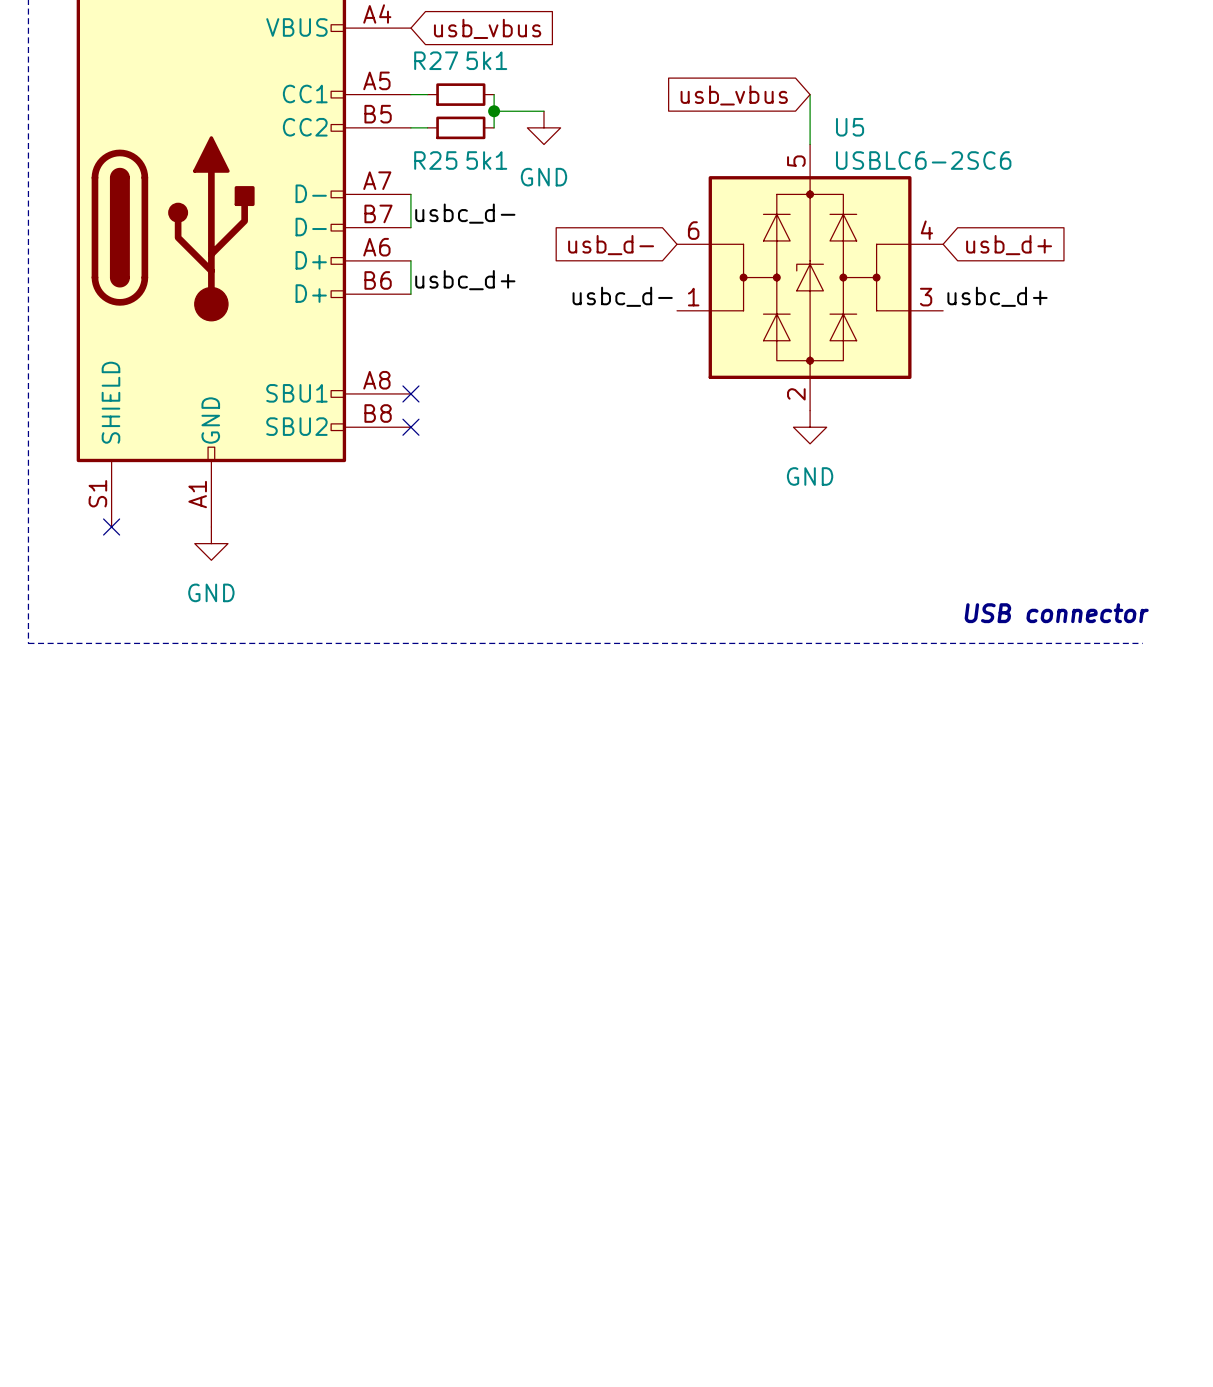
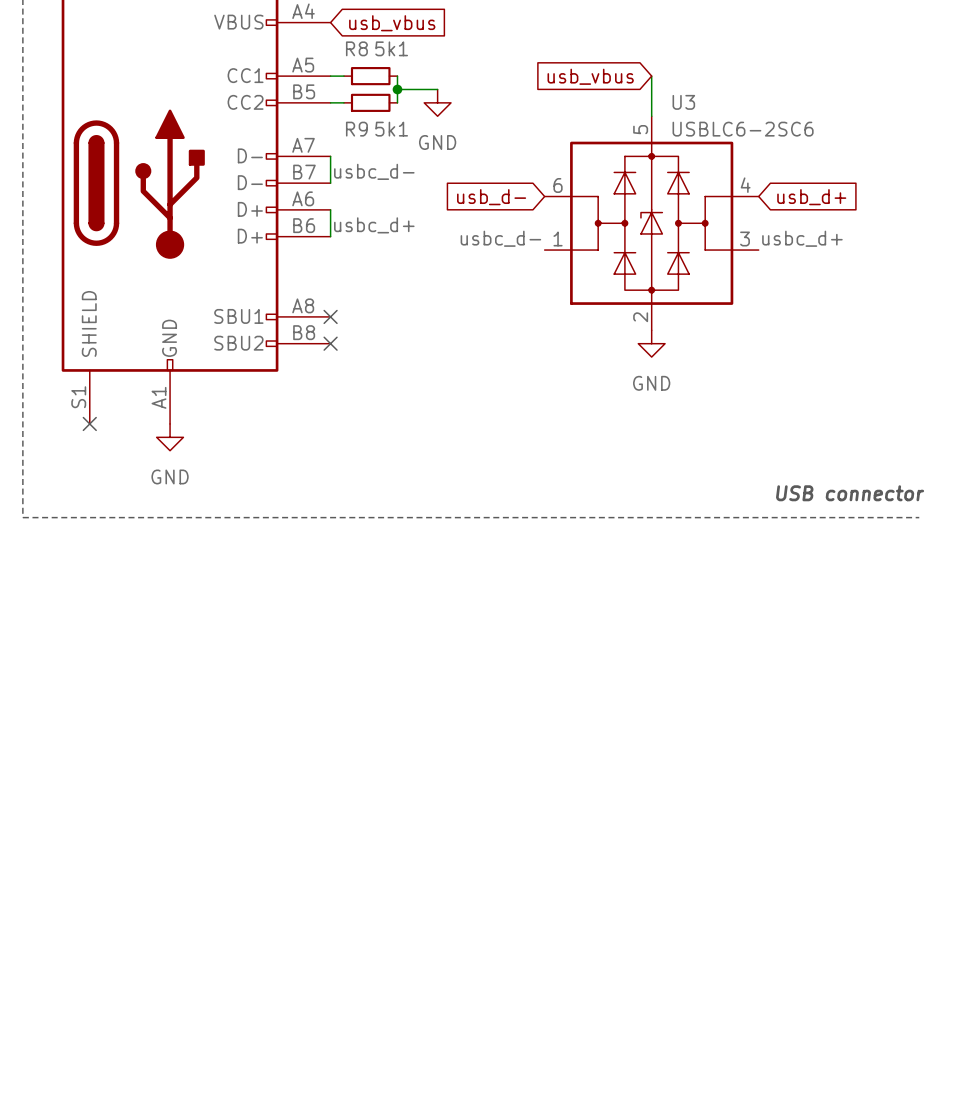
R27 name: R27 (436, 60) -> R8 (356, 48)
U5 name: U5 (850, 127) -> U3 (683, 102)
R25 name: R25 (435, 160) -> R9 (356, 129)

